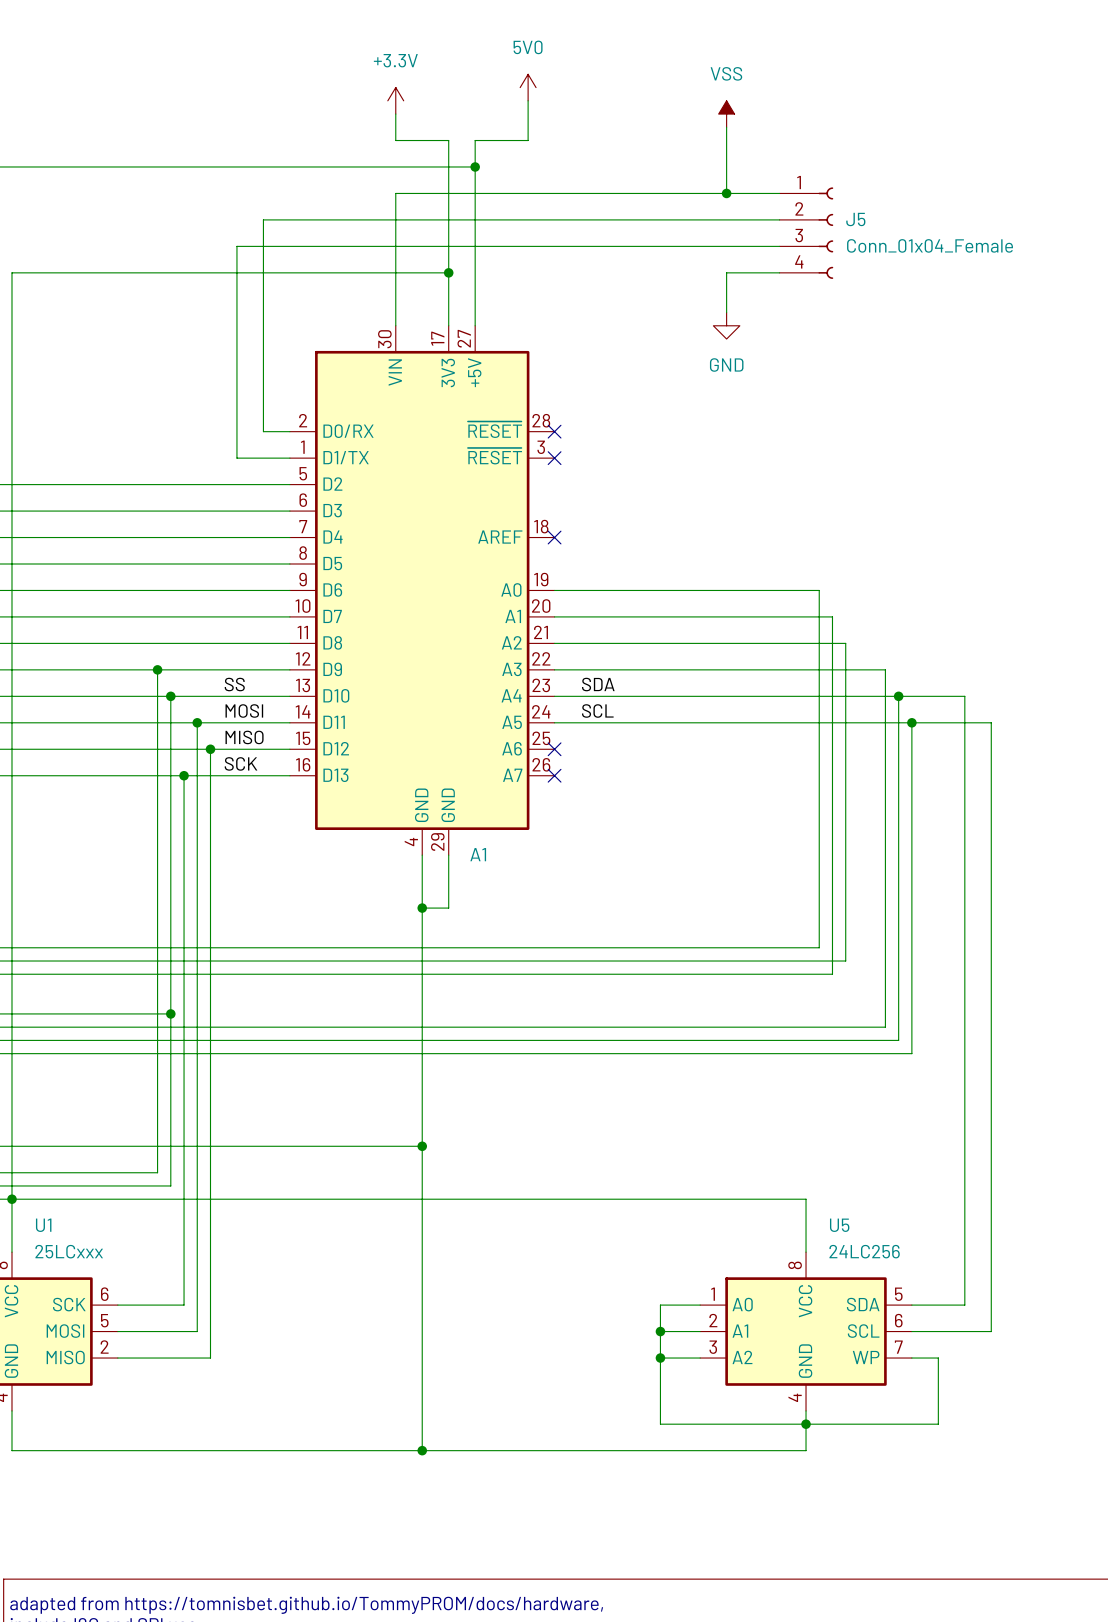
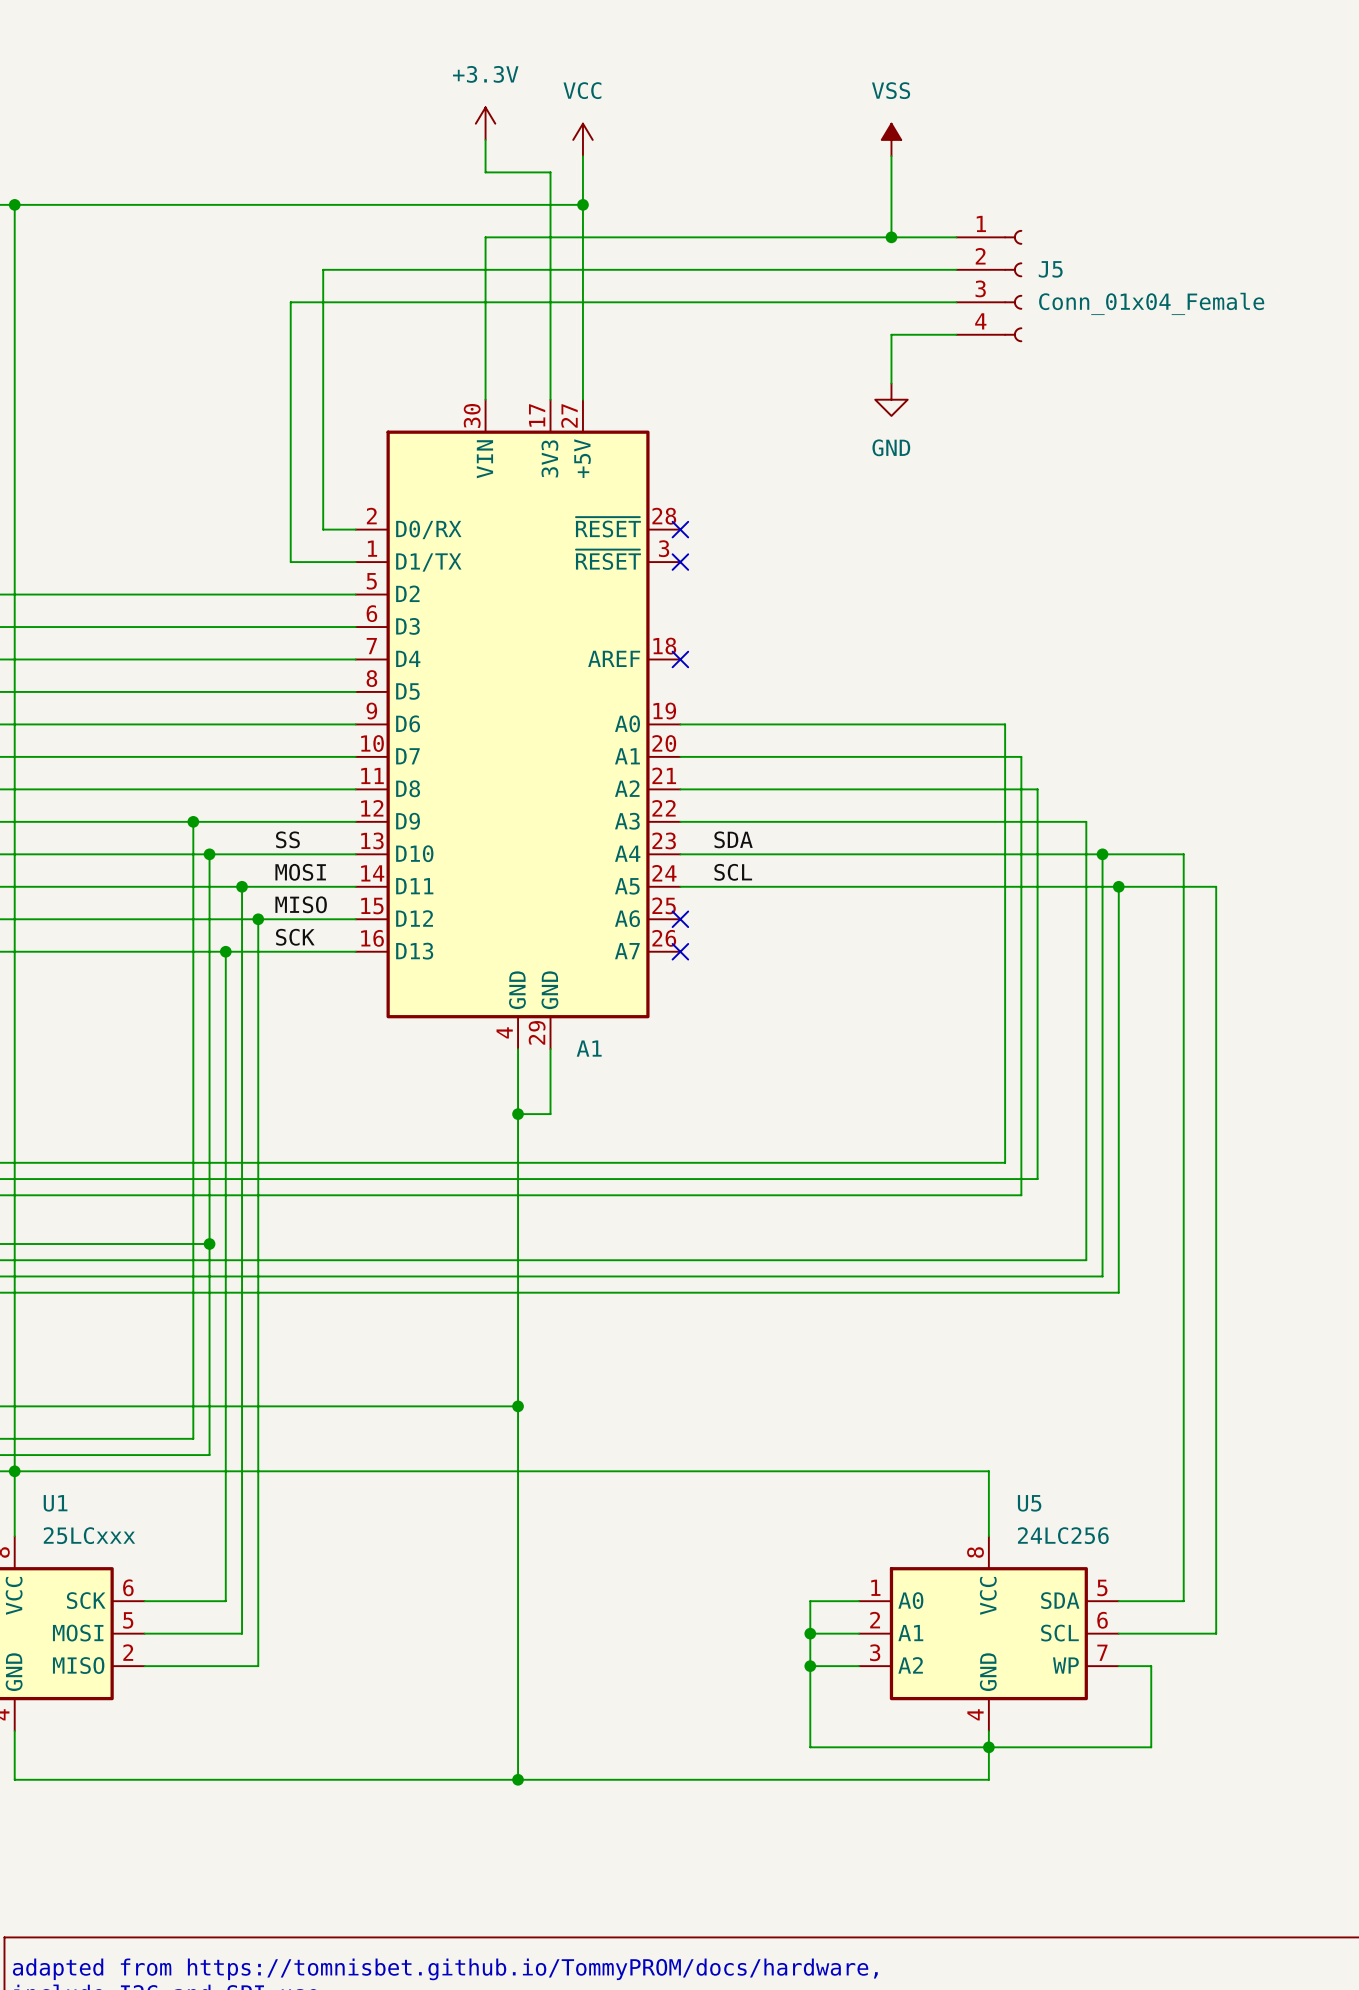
power symbol: 5V0 (528, 87) -> none
wire: (528, 100) (528, 140) (475, 140) -> (582, 156) (582, 172)
power symbol: none -> VCC (582, 139)
junction: none -> (14, 204)
wire: (11, 272) (448, 272) -> (14, 334) (14, 204)
junction: (448, 272) -> none

